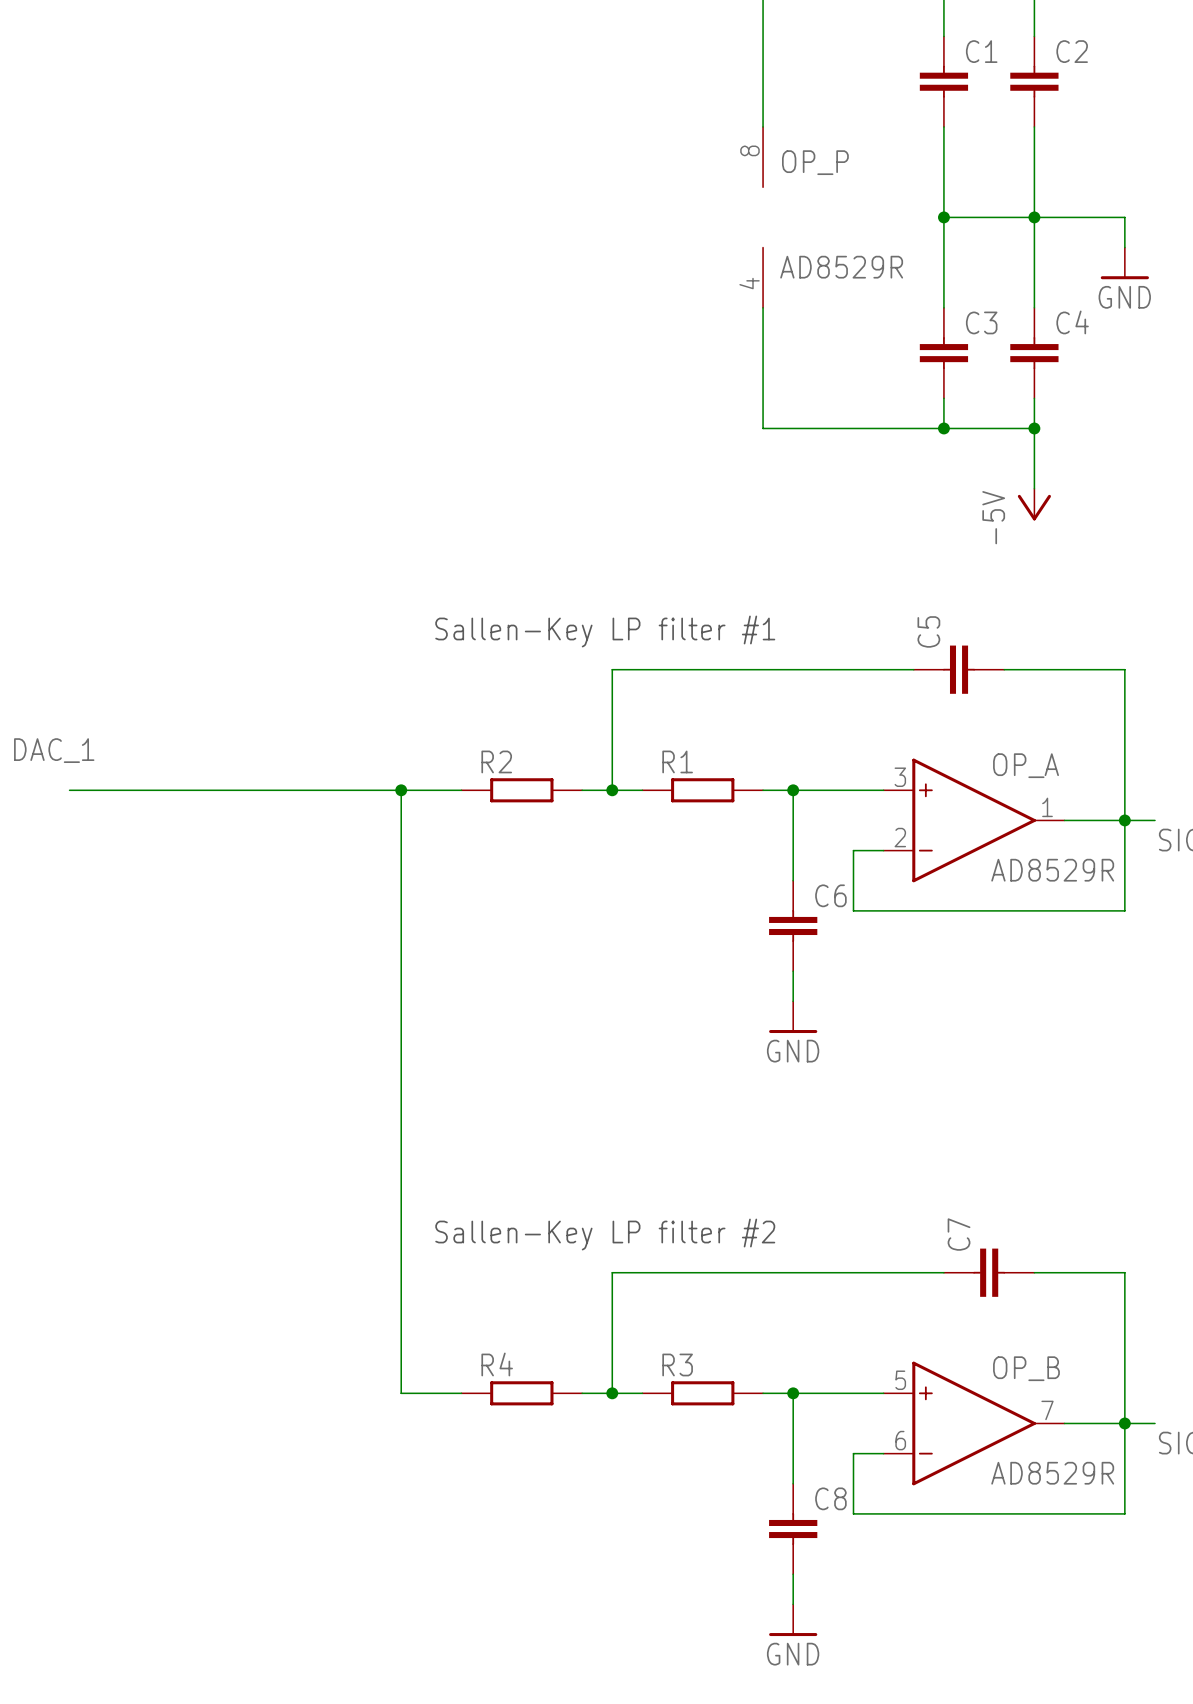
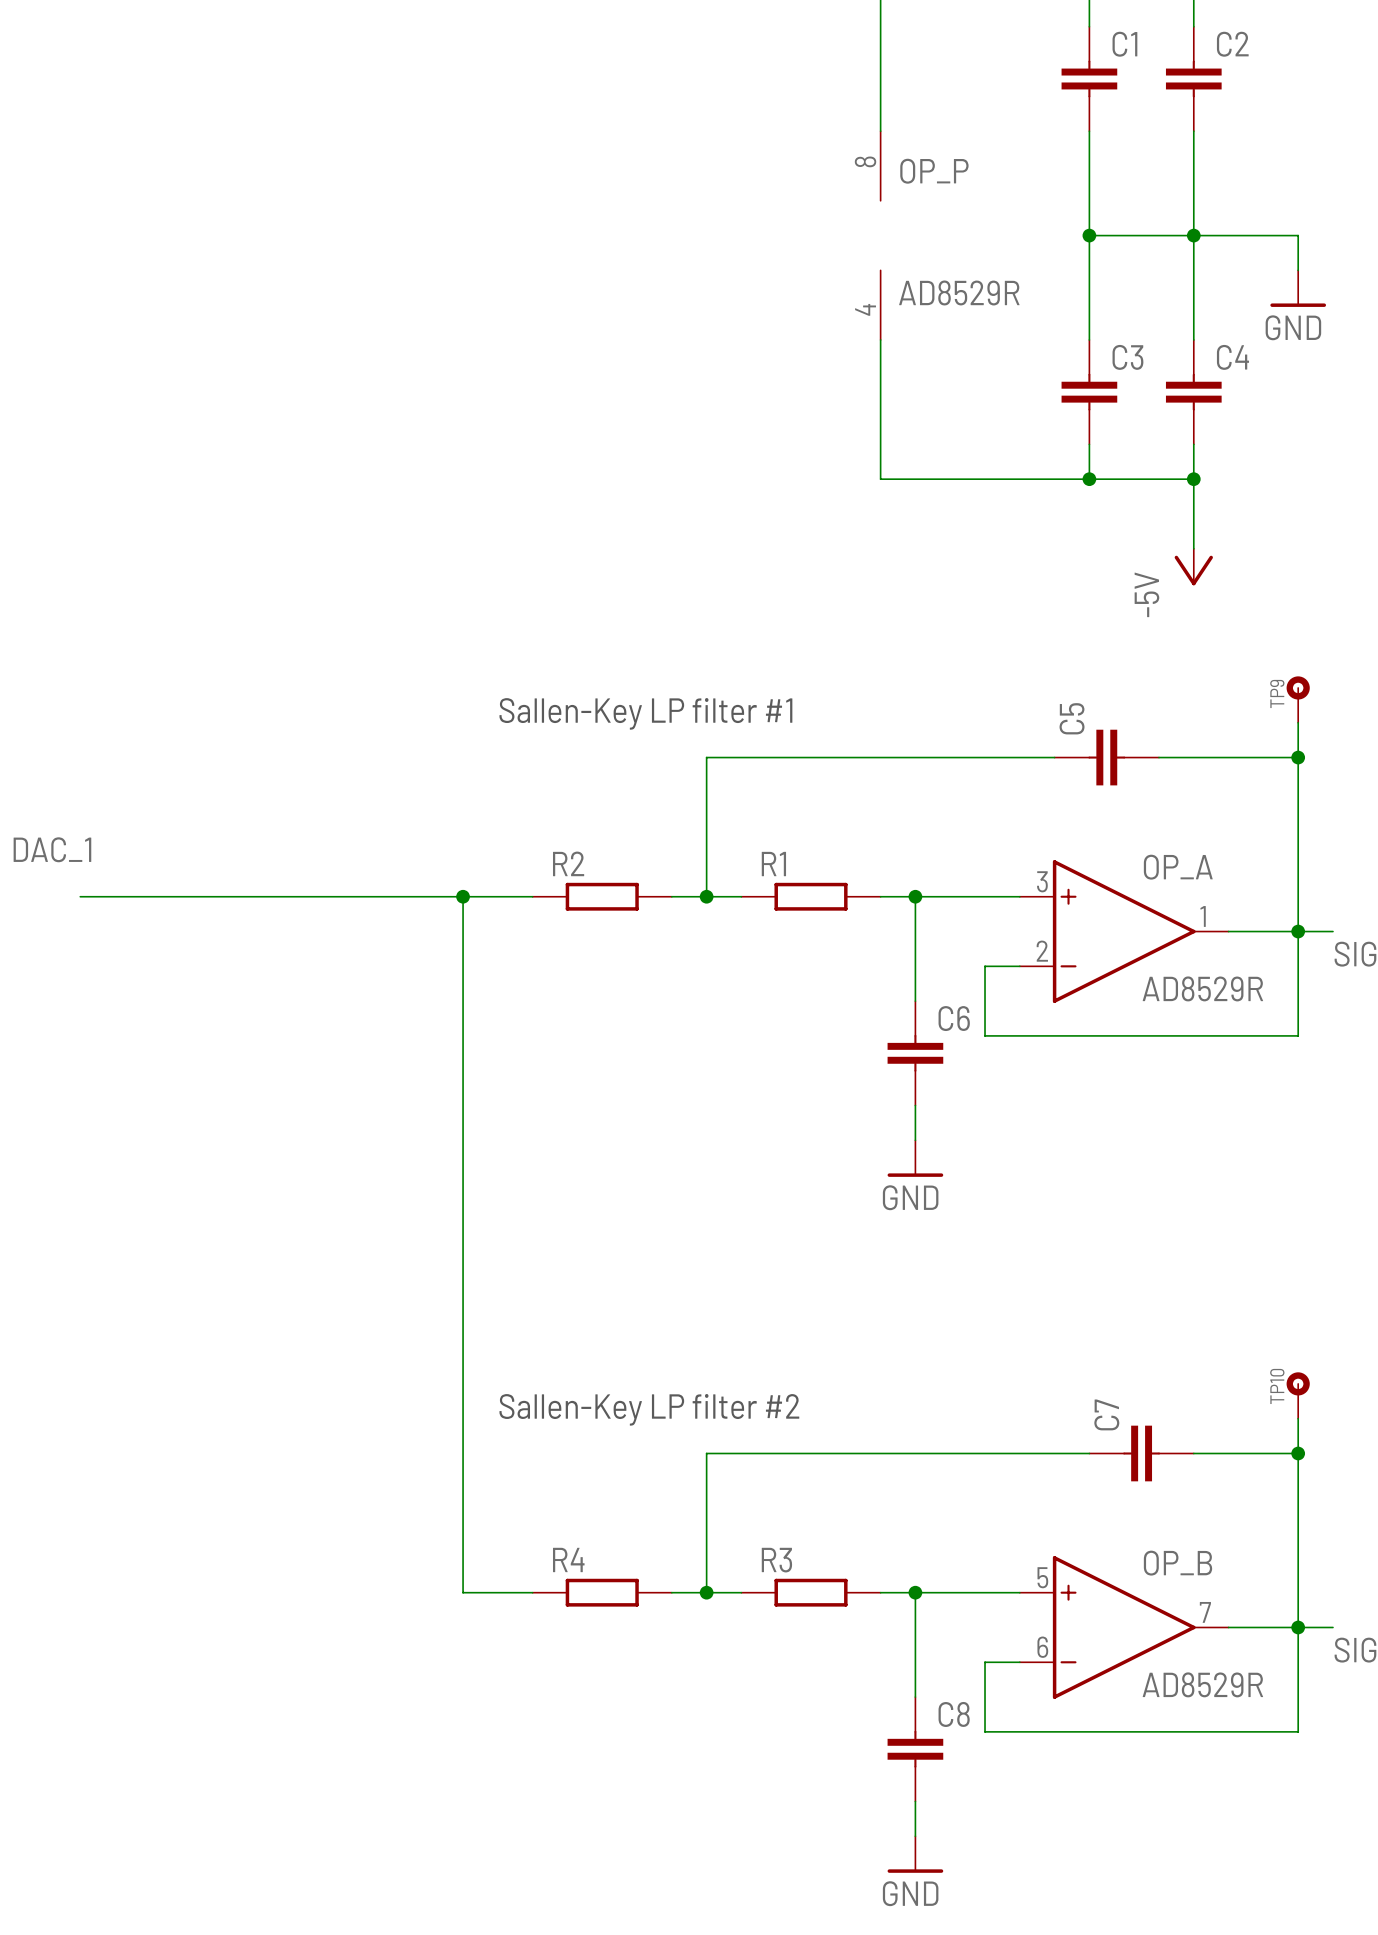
TP9: none -> (1298, 699)
wire: none -> (1298, 722) (1298, 757)
junction: none -> (1298, 757)
TP10: none -> (1298, 1395)
wire: none -> (1298, 1418) (1298, 1453)
junction: none -> (1298, 1453)

